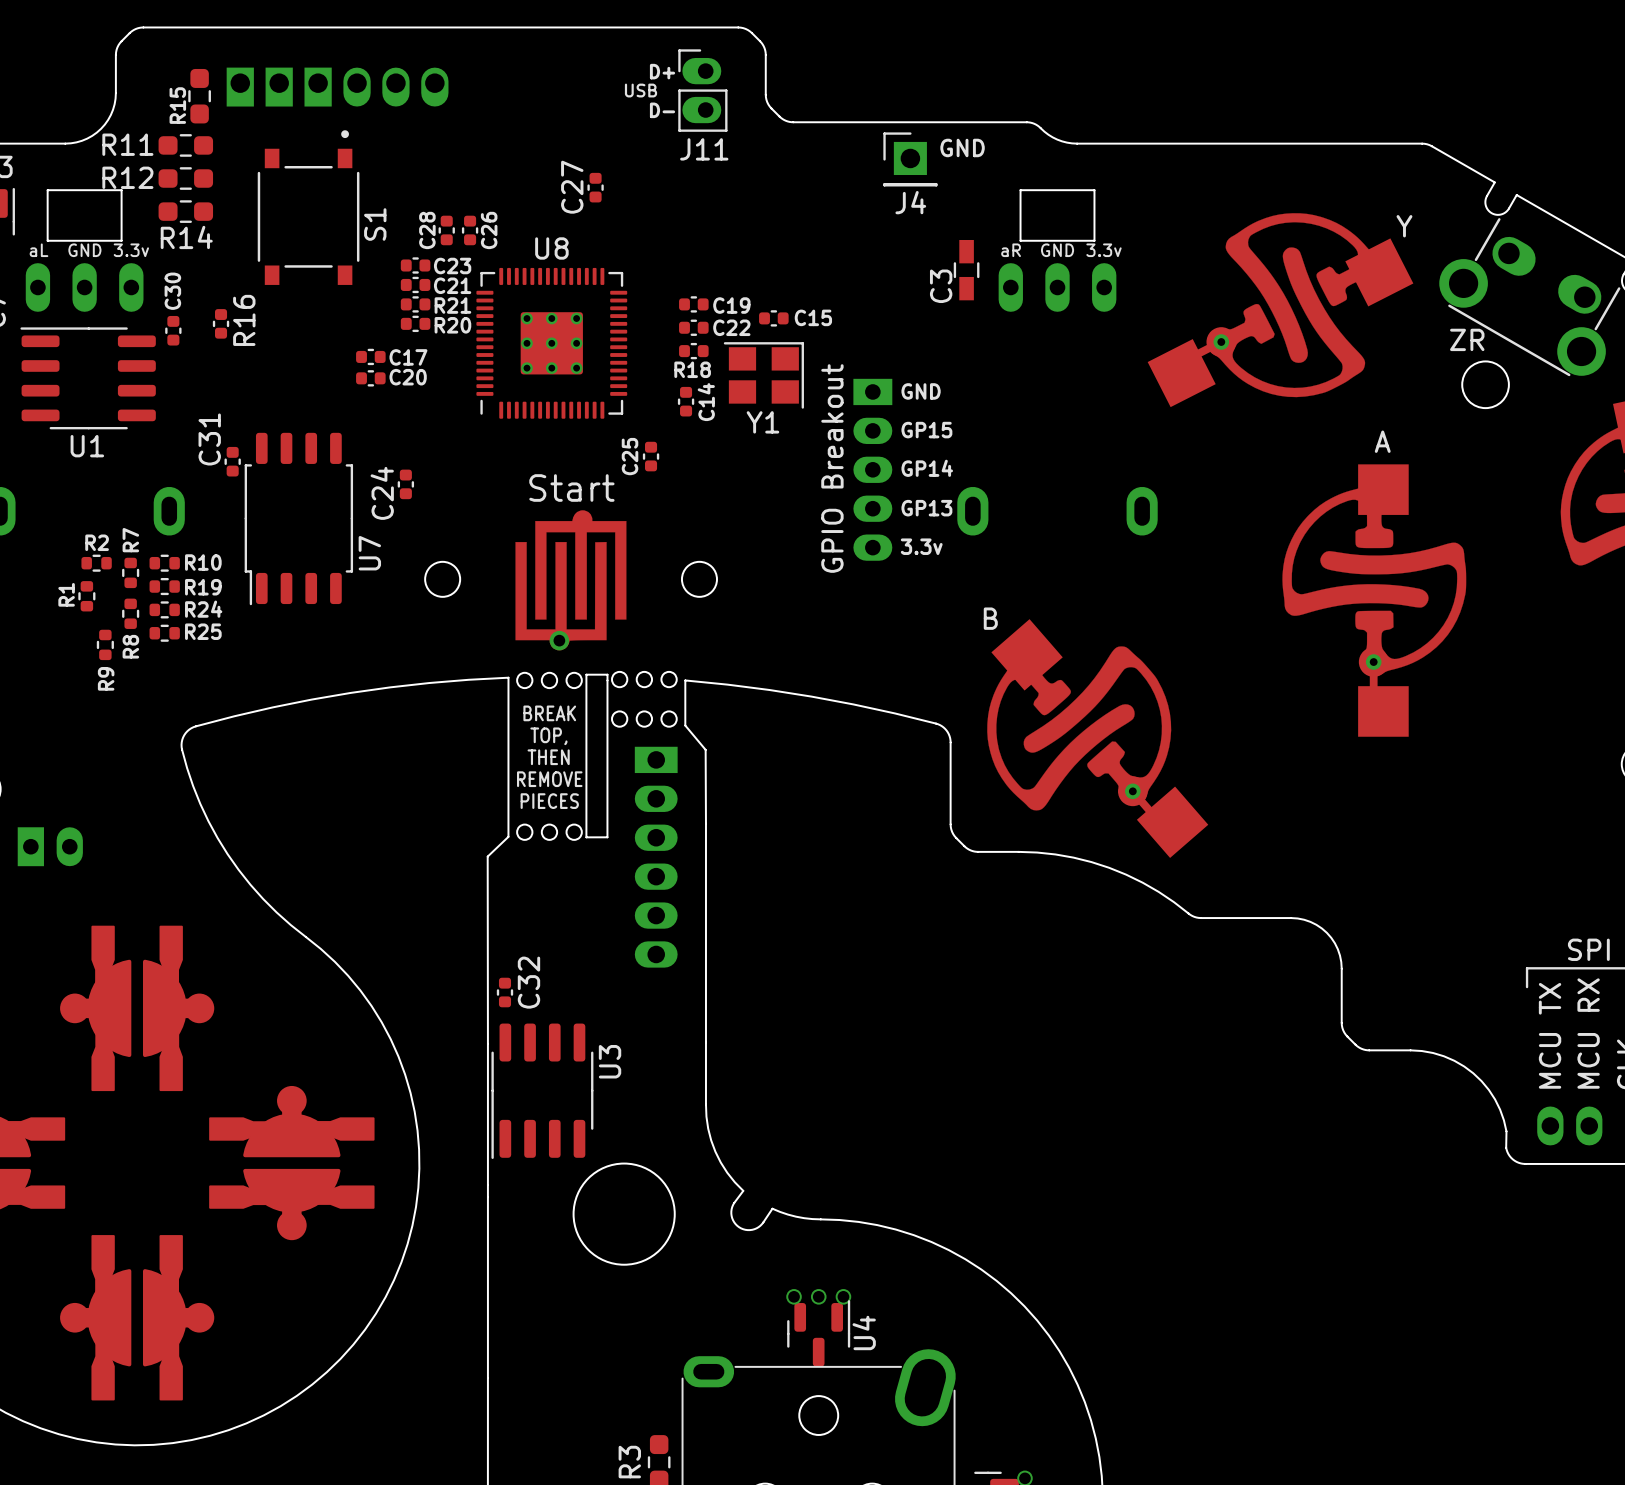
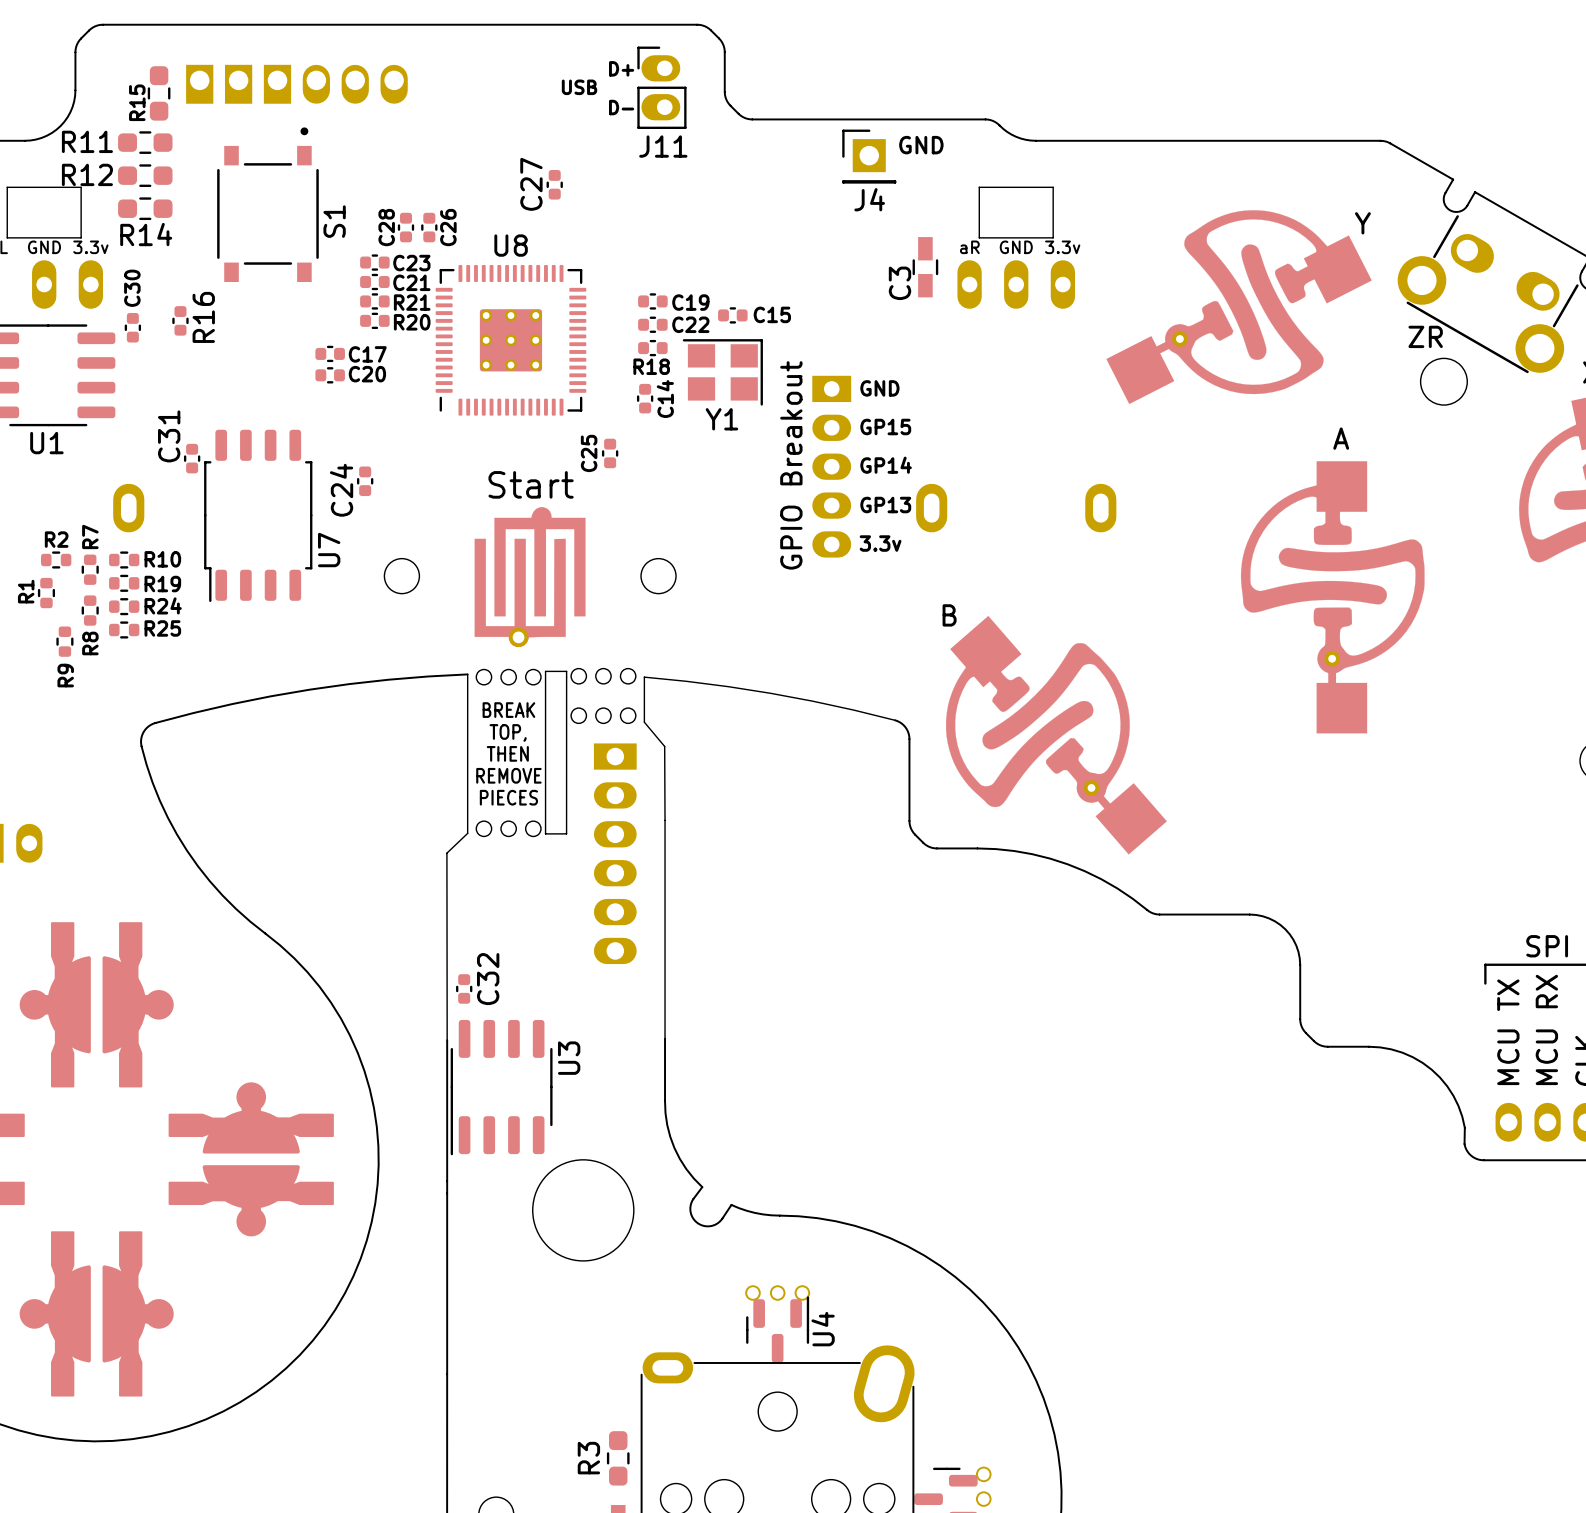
text position: USB (641, 90) -> USB (579, 87)

